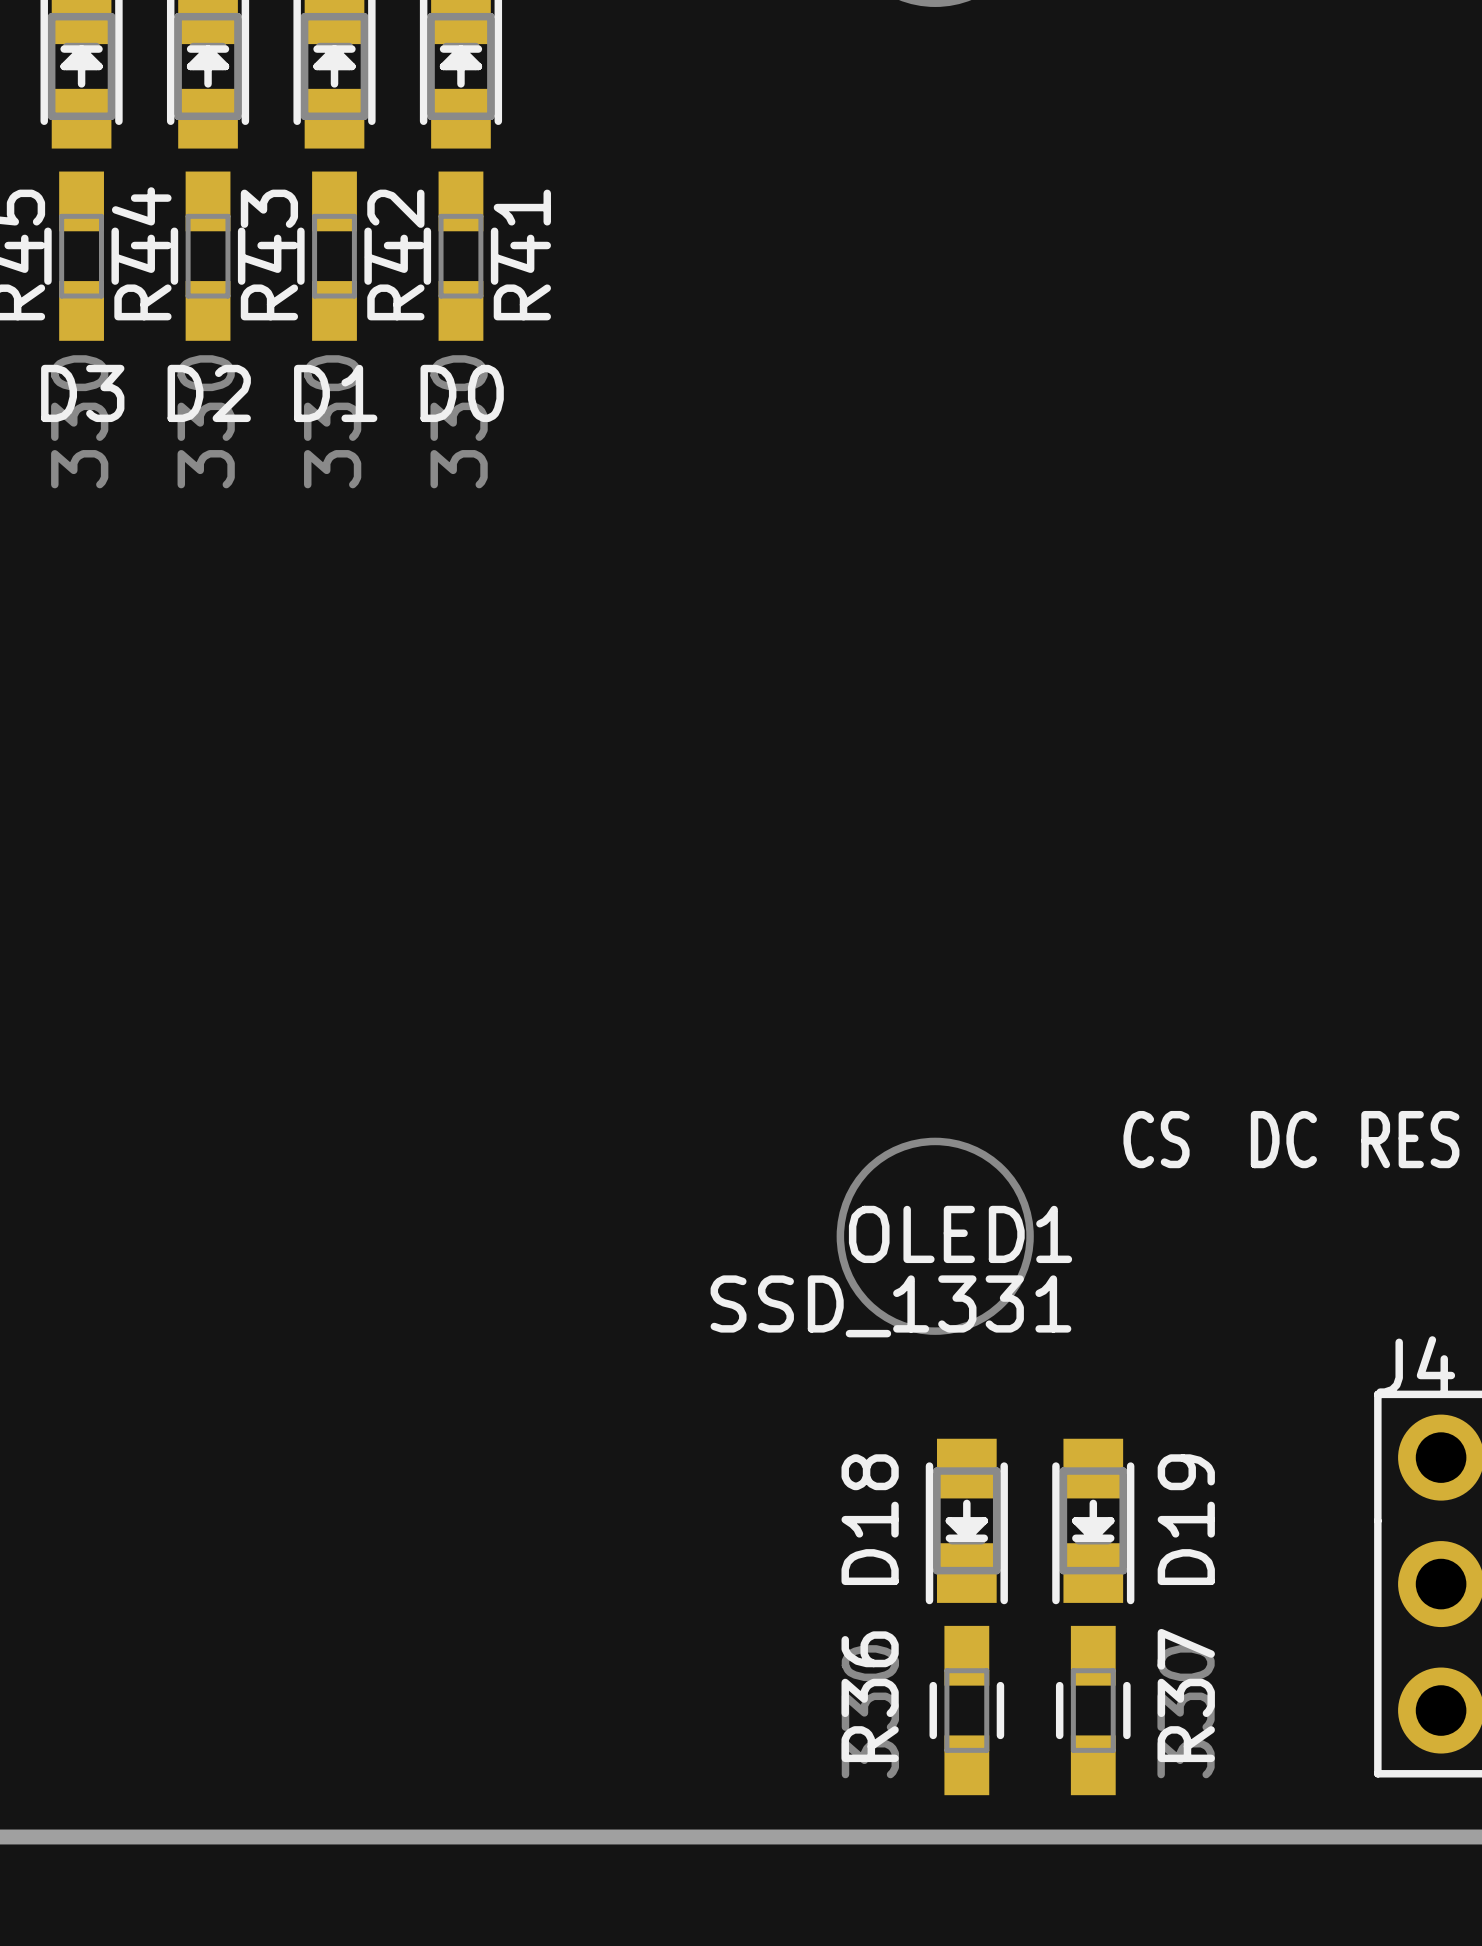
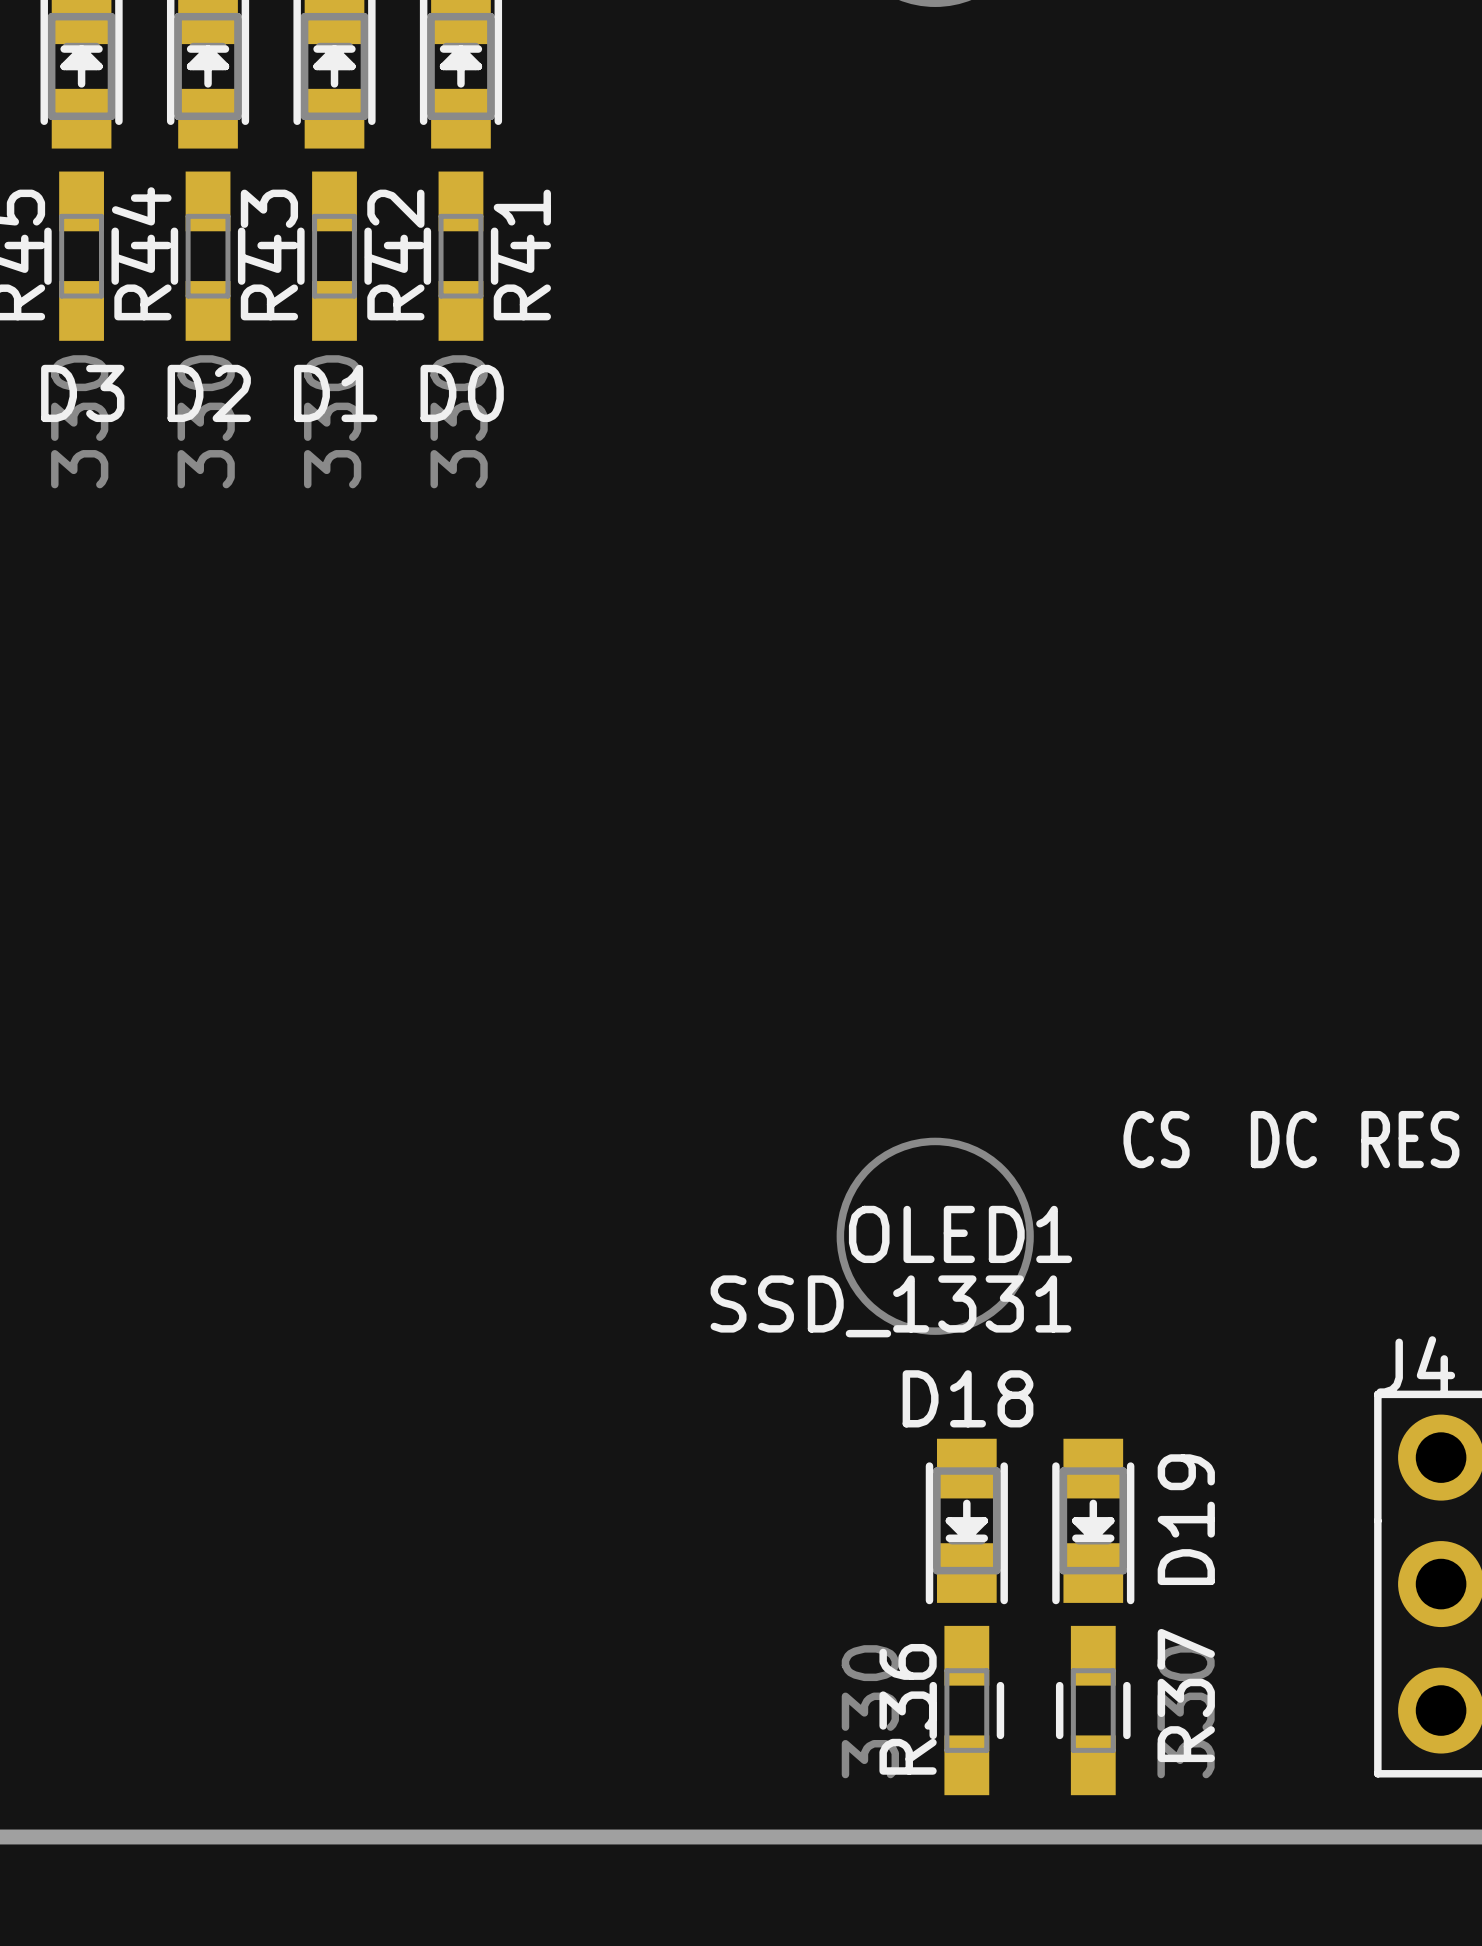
D18 name rotation: 0° (870, 1519) -> 90° clockwise (968, 1398)
R36 name position: R36 (870, 1696) -> R36 (908, 1709)

